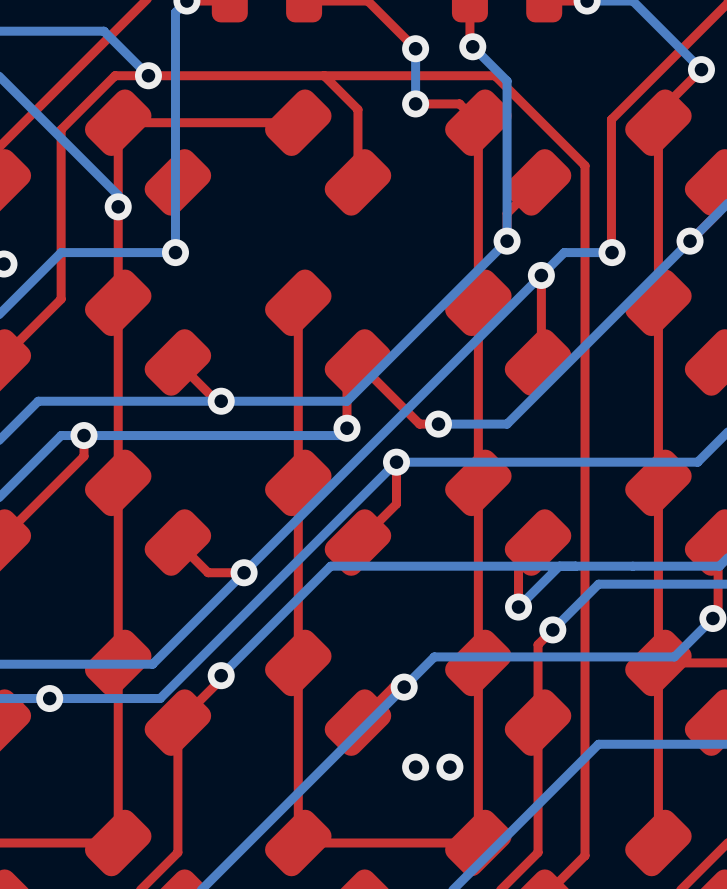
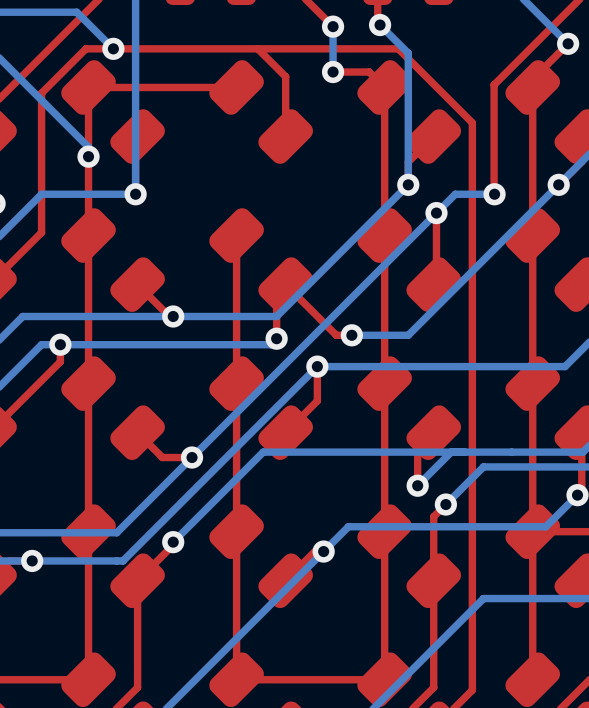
via: (415, 767) -> none
via: (449, 767) -> none

